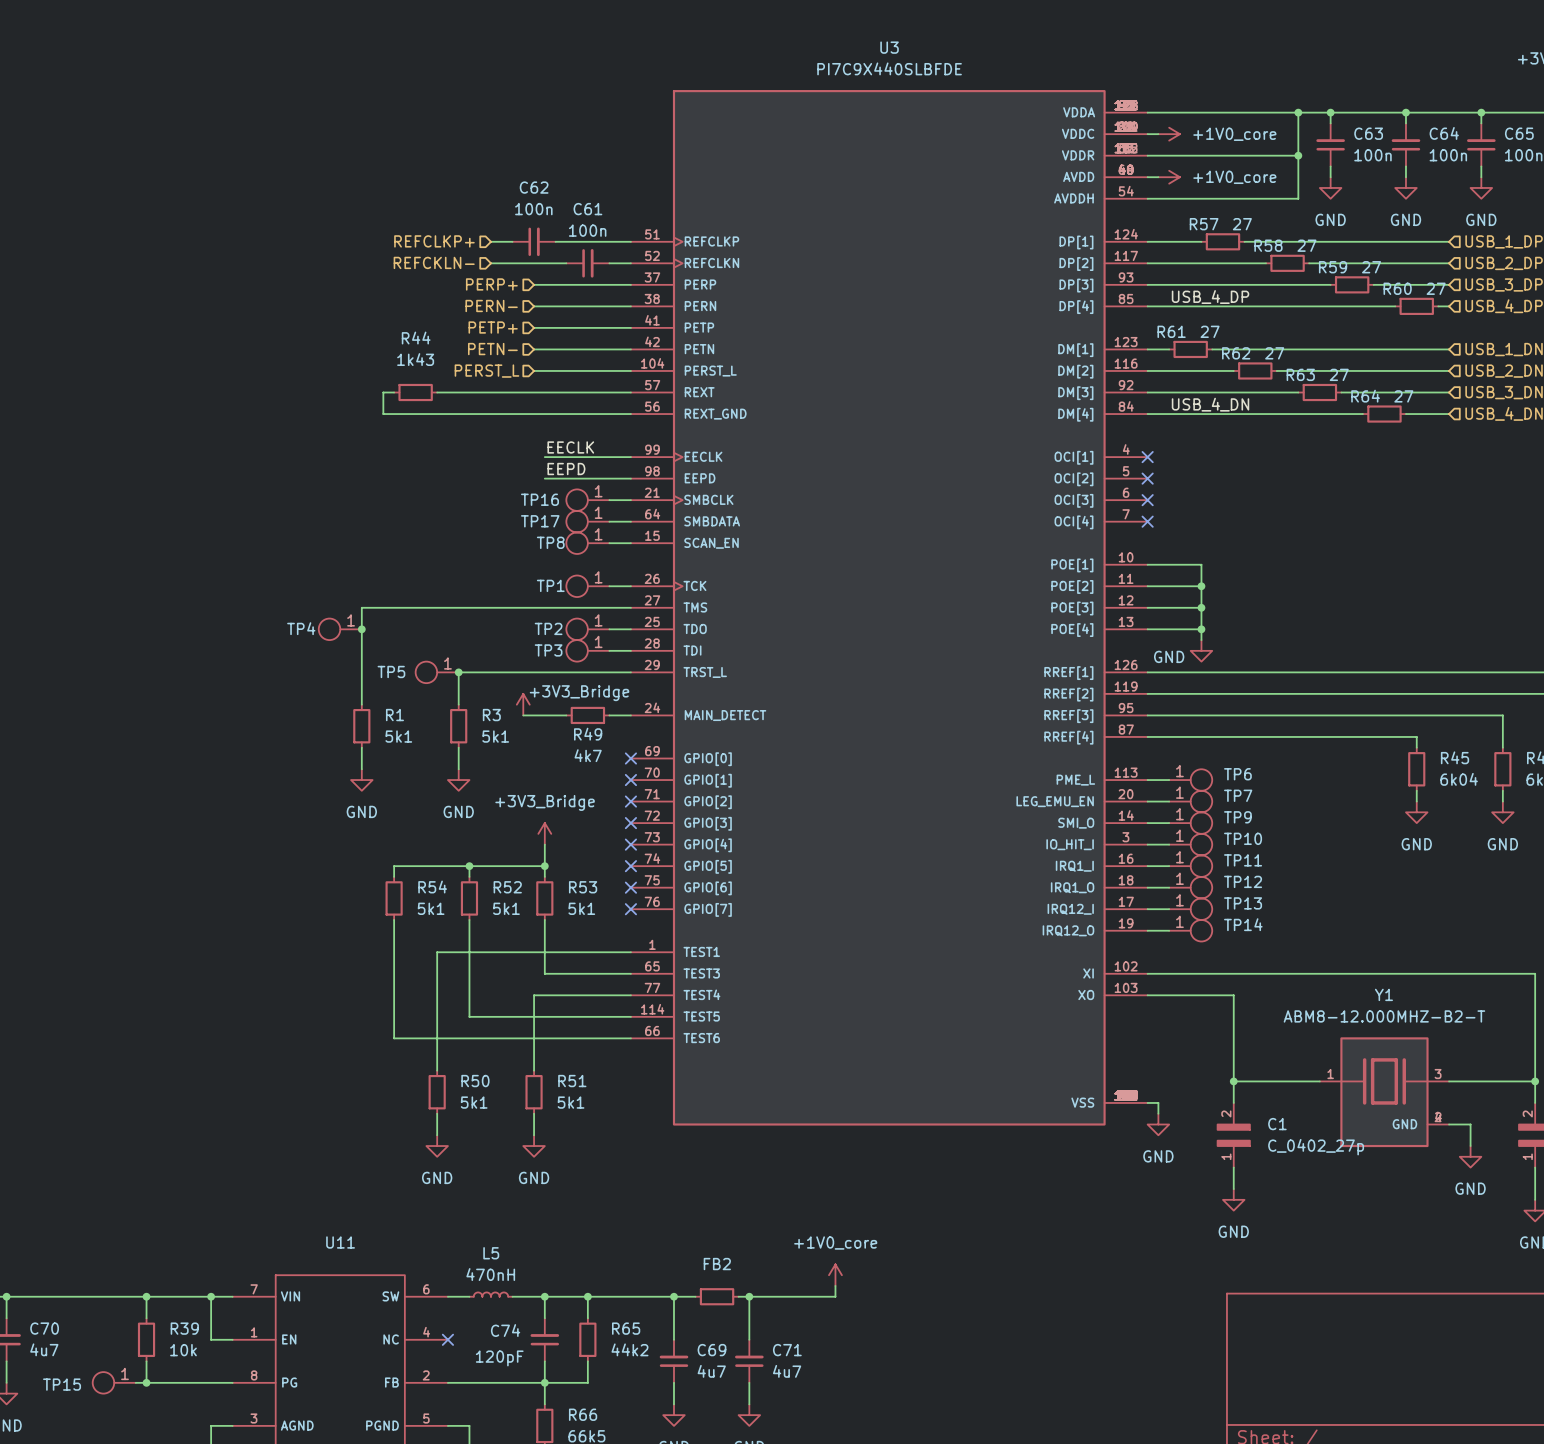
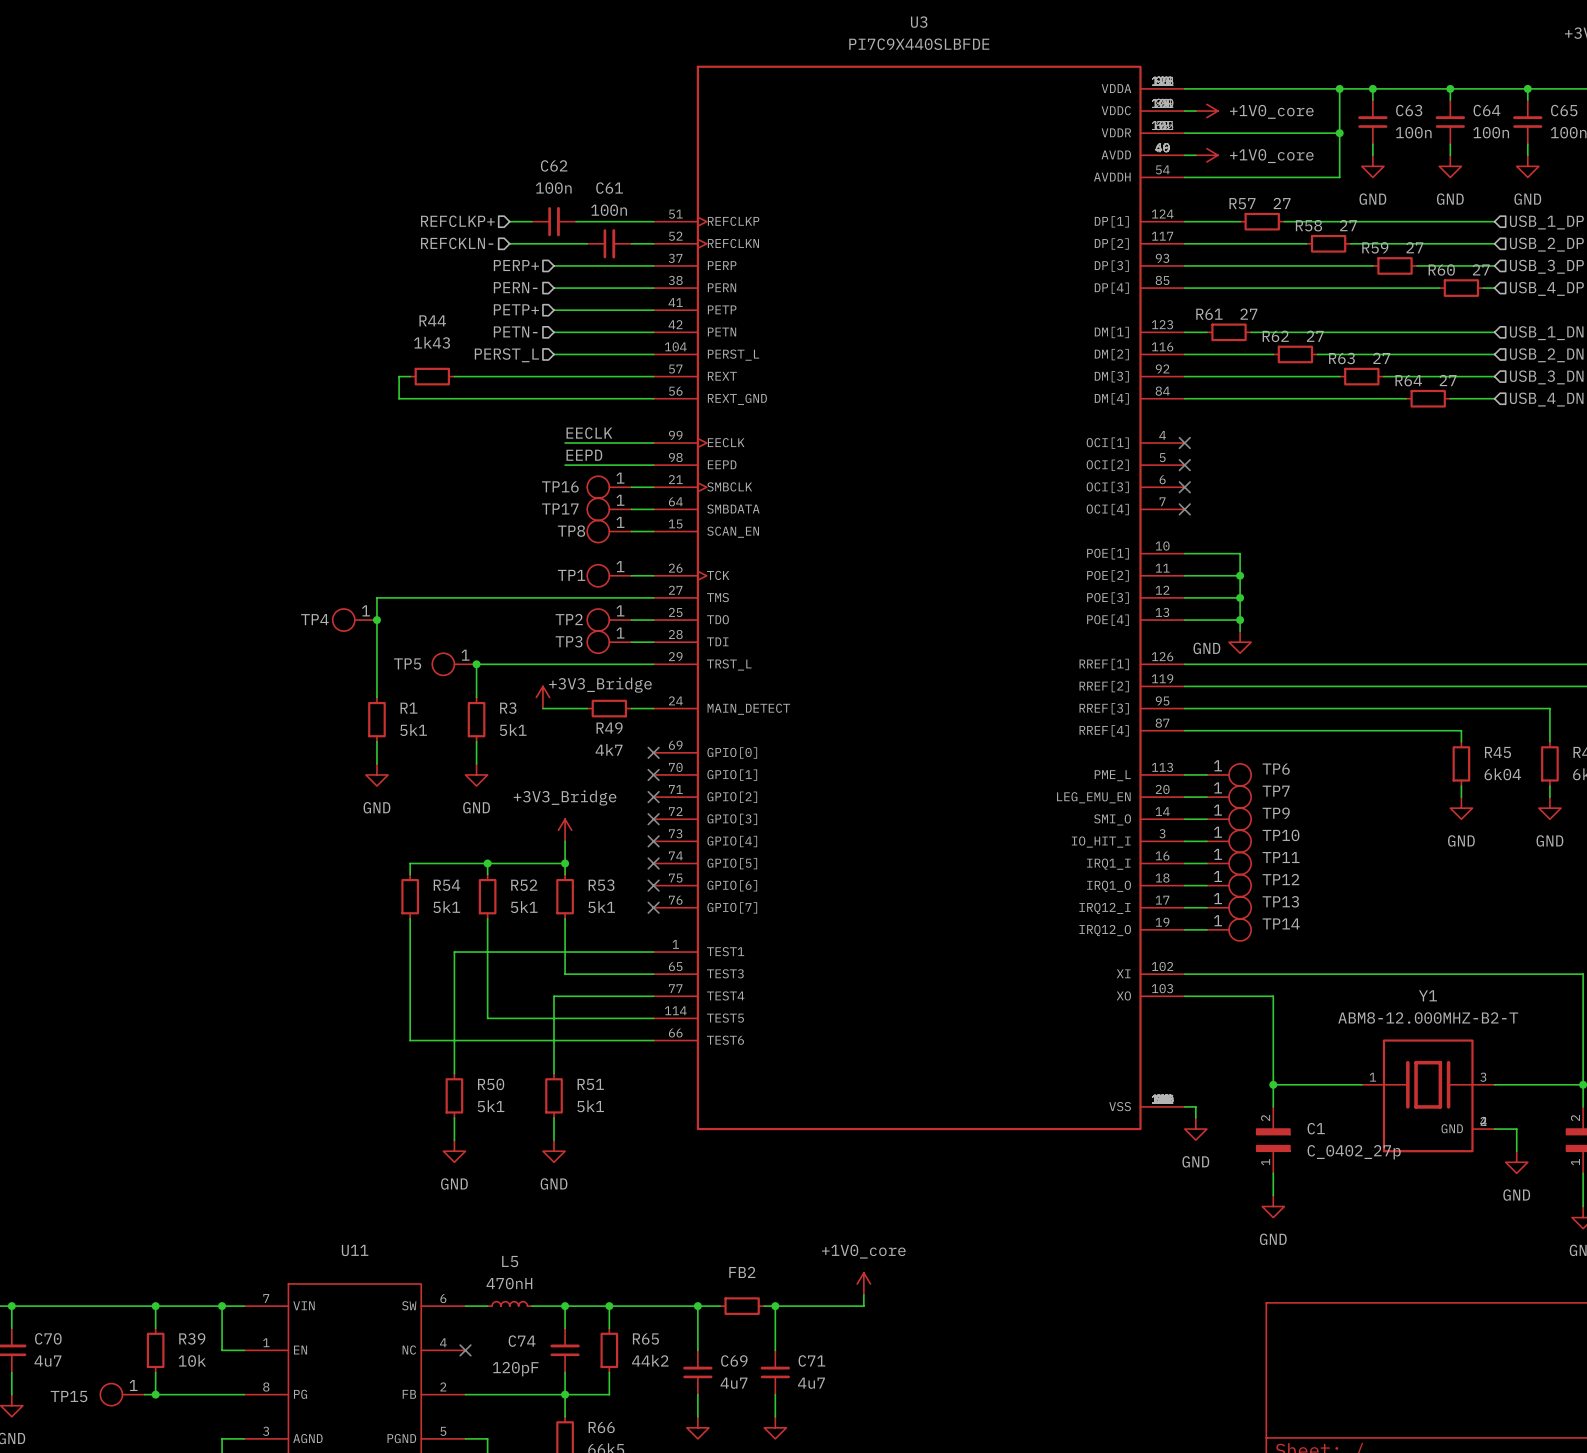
label: USB_4_DP (1210, 297) -> none
label: USB_4_DN (1210, 404) -> none

